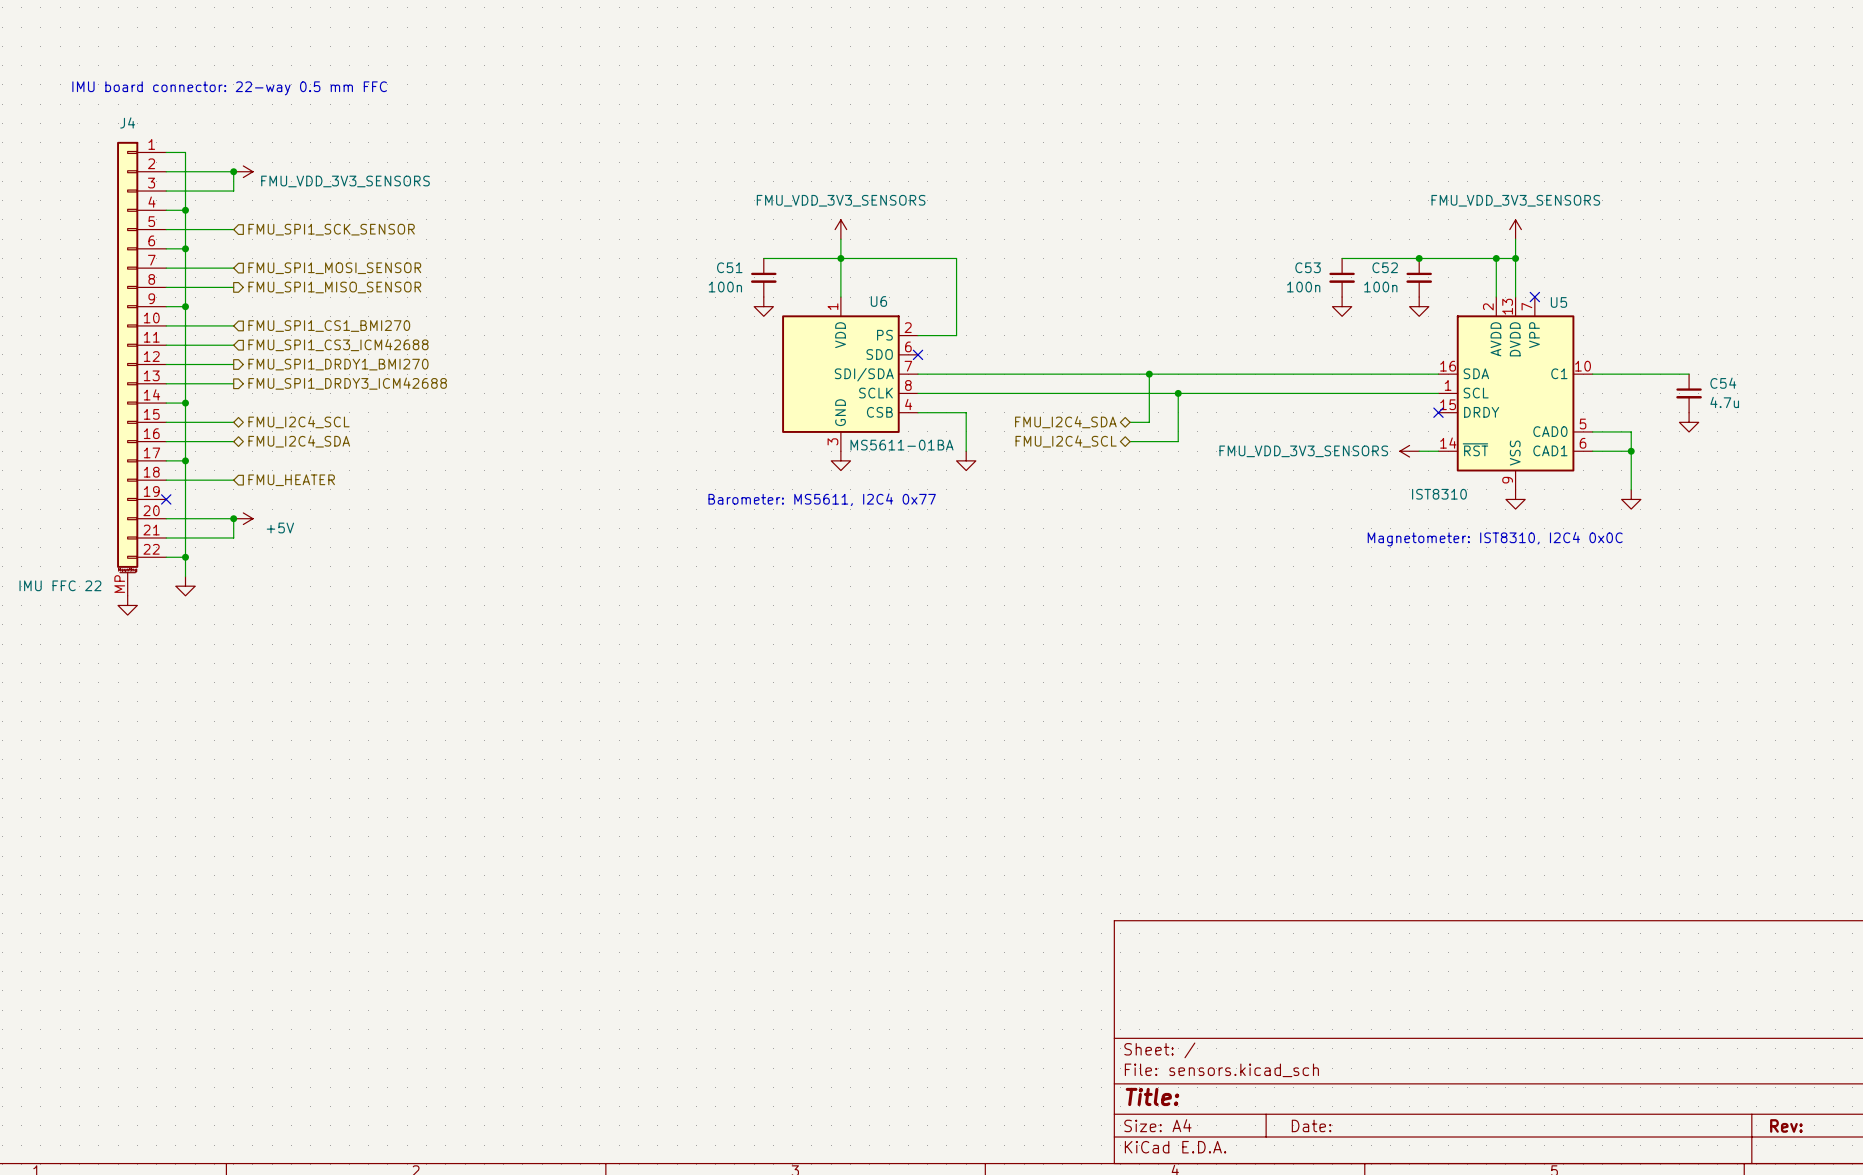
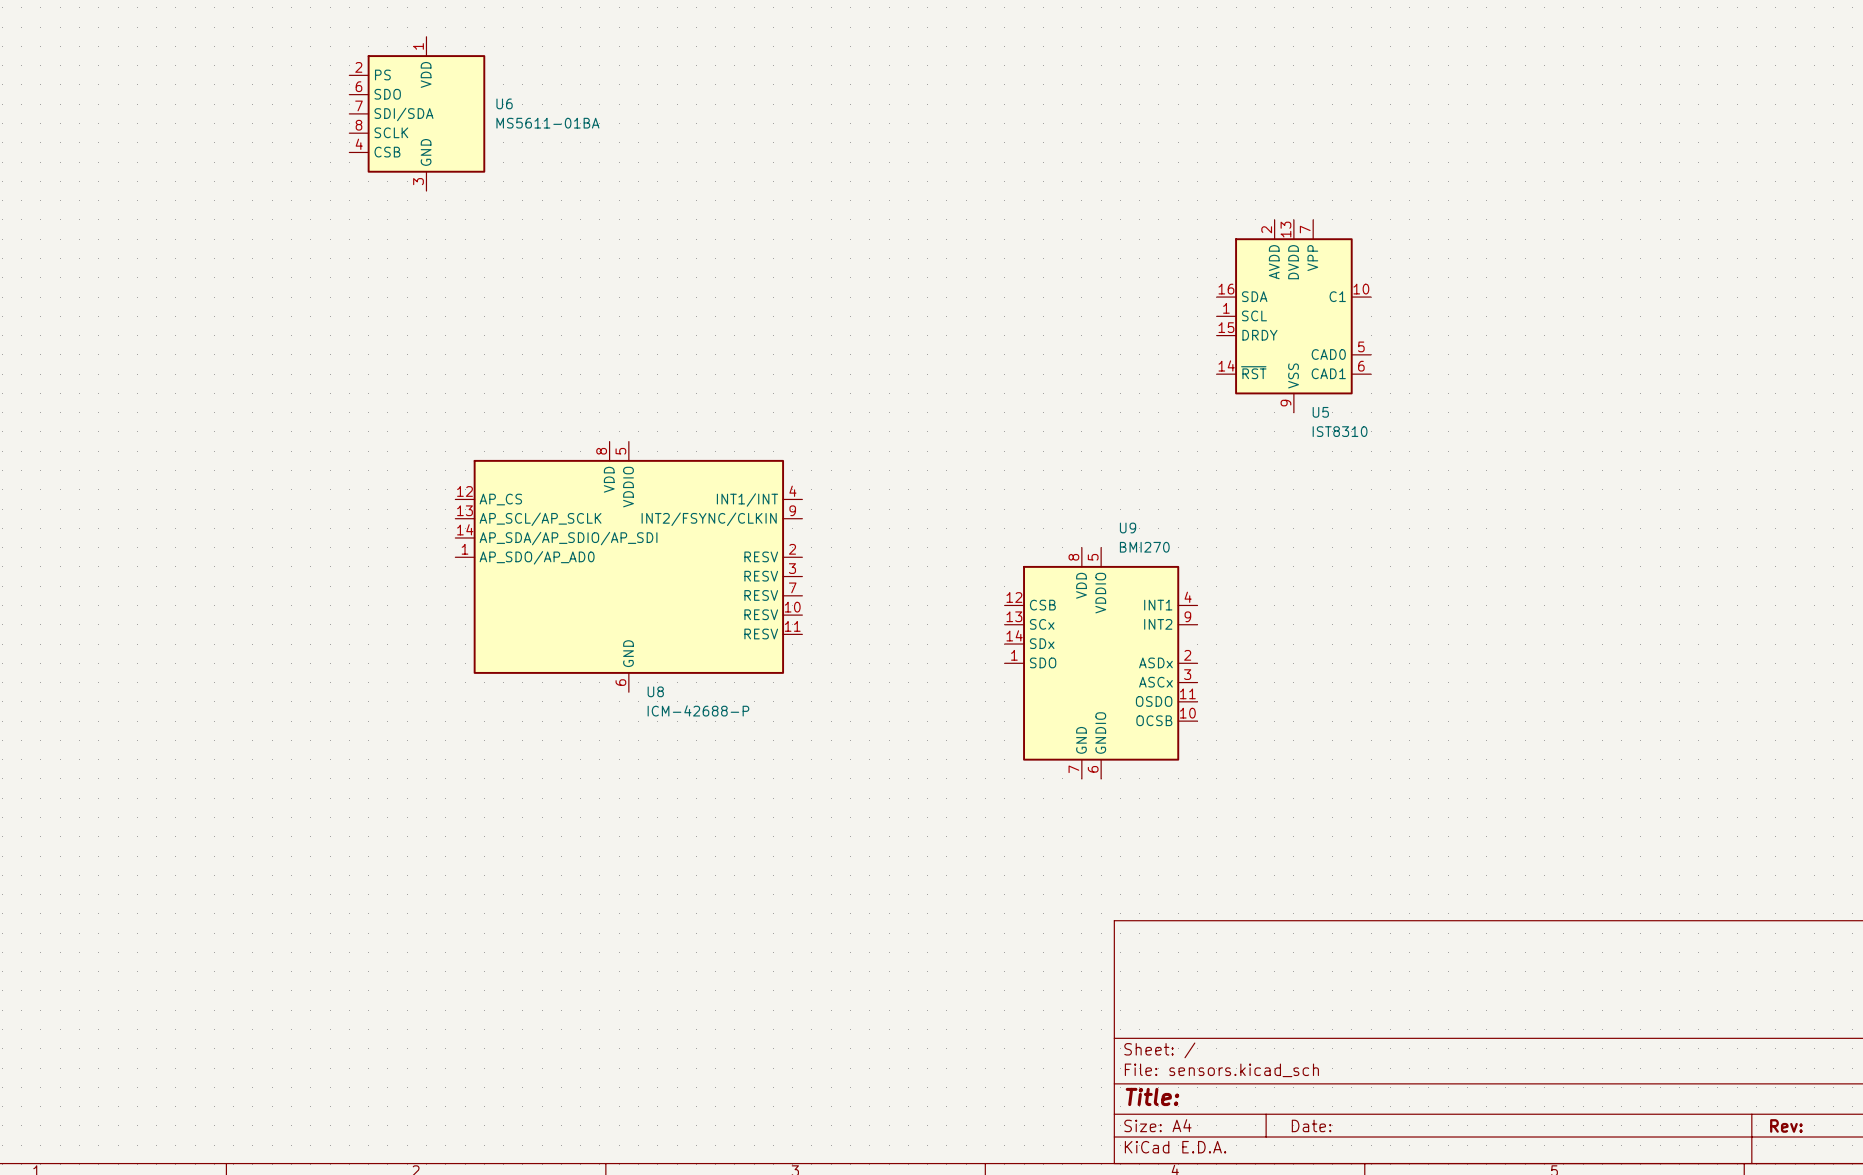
text: IMU board connector: 22-way 0.5 mm FFC (229, 88) -> none
wire: (166, 152) (185, 152) (185, 576) -> none
wire: (166, 171) (233, 171) (233, 191) (166, 191) -> none
junction: (233, 171) -> none
power symbol: FMU_VDD_3V3_SENSORS (243, 171) -> none
wire: (166, 210) (185, 210) -> none
junction: (185, 210) -> none
wire: (166, 229) (233, 229) -> none
hierarchical label: FMU_SPI1_SCK_SENSOR (331, 229) -> none
power symbol: FMU_VDD_3V3_SENSORS (840, 229) -> none
power symbol: FMU_VDD_3V3_SENSORS (1515, 229) -> none
wire: (840, 239) (840, 297) -> none
wire: (1515, 239) (1515, 297) -> none
wire: (166, 248) (185, 248) -> none
junction: (185, 248) -> none
wire: (763, 258) (956, 258) (956, 335) (918, 335) -> none
junction: (840, 258) -> none
wire: (1342, 258) (1515, 258) -> none
junction: (1419, 258) -> none
wire: (1496, 258) (1496, 297) -> none
junction: (1496, 258) -> none
junction: (1515, 258) -> none
wire: (166, 268) (233, 268) -> none
hierarchical label: FMU_SPI1_MOSI_SENSOR (334, 268) -> none
C51: 100n (763, 277) -> none
C53: 100n (1342, 277) -> none
C52: 100n (1419, 277) -> none
wire: (166, 287) (233, 287) -> none
hierarchical label: FMU_SPI1_MISO_SENSOR (334, 287) -> none
no-connect mark: (1534, 297) -> none
U6 name position: U6 (878, 301) -> U6 (504, 103)
U5 name position: U5 (1558, 302) -> U5 (1320, 412)
wire: (166, 306) (185, 306) -> none
junction: (185, 306) -> none
power symbol: (763, 306) -> none
power symbol: (1342, 306) -> none
power symbol: (1419, 306) -> none
wire: (166, 325) (233, 325) -> none
hierarchical label: FMU_SPI1_CS1_BMI270 (329, 326) -> none
wire: (166, 345) (233, 345) -> none
hierarchical label: FMU_SPI1_CS3_ICM42688 (338, 345) -> none
no-connect mark: (918, 354) -> none
wire: (166, 364) (233, 364) -> none
hierarchical label: FMU_SPI1_DRDY1_BMI270 (338, 364) -> none
J4: IMU FFC 22 (141, 368) -> none
U6 flip: as is (840, 374) -> left-right (426, 113)
U6 position: (850, 374) -> (417, 113)
wire: (918, 374) (1438, 374) -> none
wire: (1149, 374) (1149, 422) (1130, 422) -> none
junction: (1149, 374) -> none
wire: (1592, 374) (1689, 374) -> none
wire: (166, 383) (233, 383) -> none
hierarchical label: FMU_SPI1_DRDY3_ICM42688 (347, 383) -> none
wire: (918, 393) (1438, 393) -> none
wire: (1178, 393) (1178, 441) (1130, 441) -> none
junction: (1178, 393) -> none
U5 position: (1515, 393) -> (1293, 316)
C54: 4.7u (1689, 393) -> none
wire: (166, 403) (185, 403) -> none
junction: (185, 403) -> none
wire: (918, 412) (966, 412) (966, 451) -> none
no-connect mark: (1438, 412) -> none
wire: (166, 422) (233, 422) -> none
hierarchical label: FMU_I2C4_SCL (299, 422) -> none
hierarchical label: FMU_I2C4_SDA (1065, 422) -> none
power symbol: (1689, 422) -> none
wire: (1592, 431) (1631, 431) (1631, 489) -> none
wire: (166, 441) (233, 441) -> none
hierarchical label: FMU_I2C4_SDA (299, 441) -> none
hierarchical label: FMU_I2C4_SCL (1066, 441) -> none
U6 value position: MS5611-01BA (902, 445) -> MS5611-01BA (547, 123)
power symbol: FMU_VDD_3V3_SENSORS (1409, 451) -> none
wire: (1419, 451) (1438, 451) -> none
wire: (1592, 451) (1631, 451) -> none
junction: (1631, 451) -> none
wire: (166, 460) (185, 460) -> none
junction: (185, 460) -> none
power symbol: (840, 460) -> none
power symbol: (966, 460) -> none
wire: (166, 480) (233, 480) -> none
hierarchical label: FMU_HEATER (291, 480) -> none
U5 value position: IST8310 (1439, 494) -> IST8310 (1340, 431)
no-connect mark: (166, 499) -> none
text: Barometer: MS5611, I2C4 0x77 (822, 499) -> none
power symbol: (1515, 499) -> none
power symbol: (1631, 499) -> none
wire: (166, 518) (233, 518) (233, 537) (166, 537) -> none
junction: (233, 518) -> none
power symbol: +5V (243, 518) -> none
text: Magnetometer: IST8310, I2C4 0x0C (1495, 539) -> none
wire: (166, 557) (185, 557) -> none
junction: (185, 557) -> none
U8: none -> ICM-42688-P (628, 566)
power symbol: (185, 586) -> none
power symbol: (127, 605) -> none
U9: none -> BMI270 (1101, 663)

